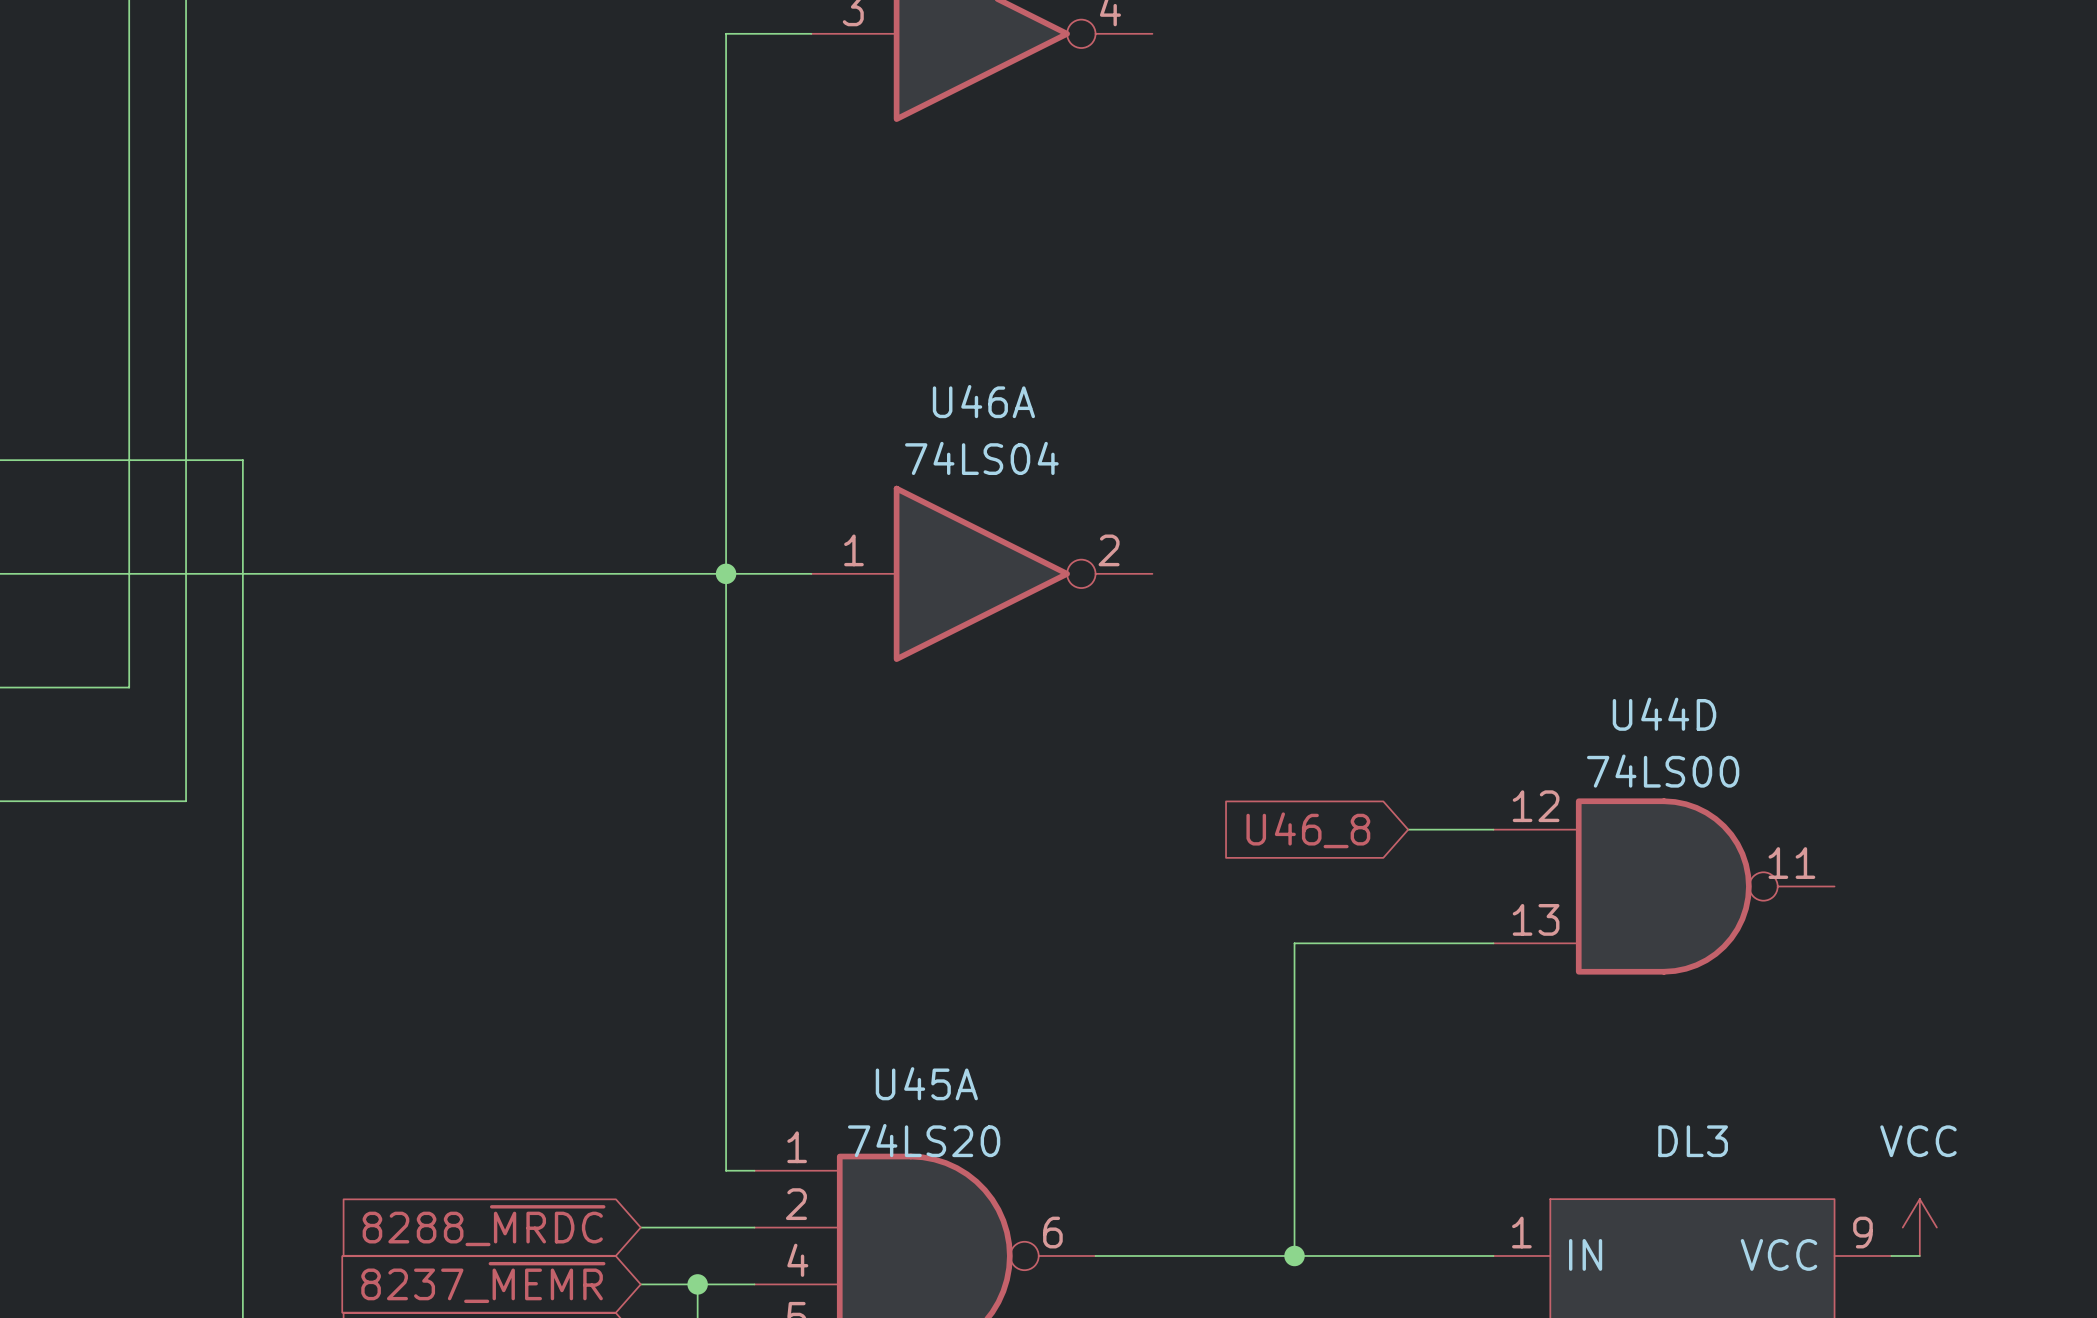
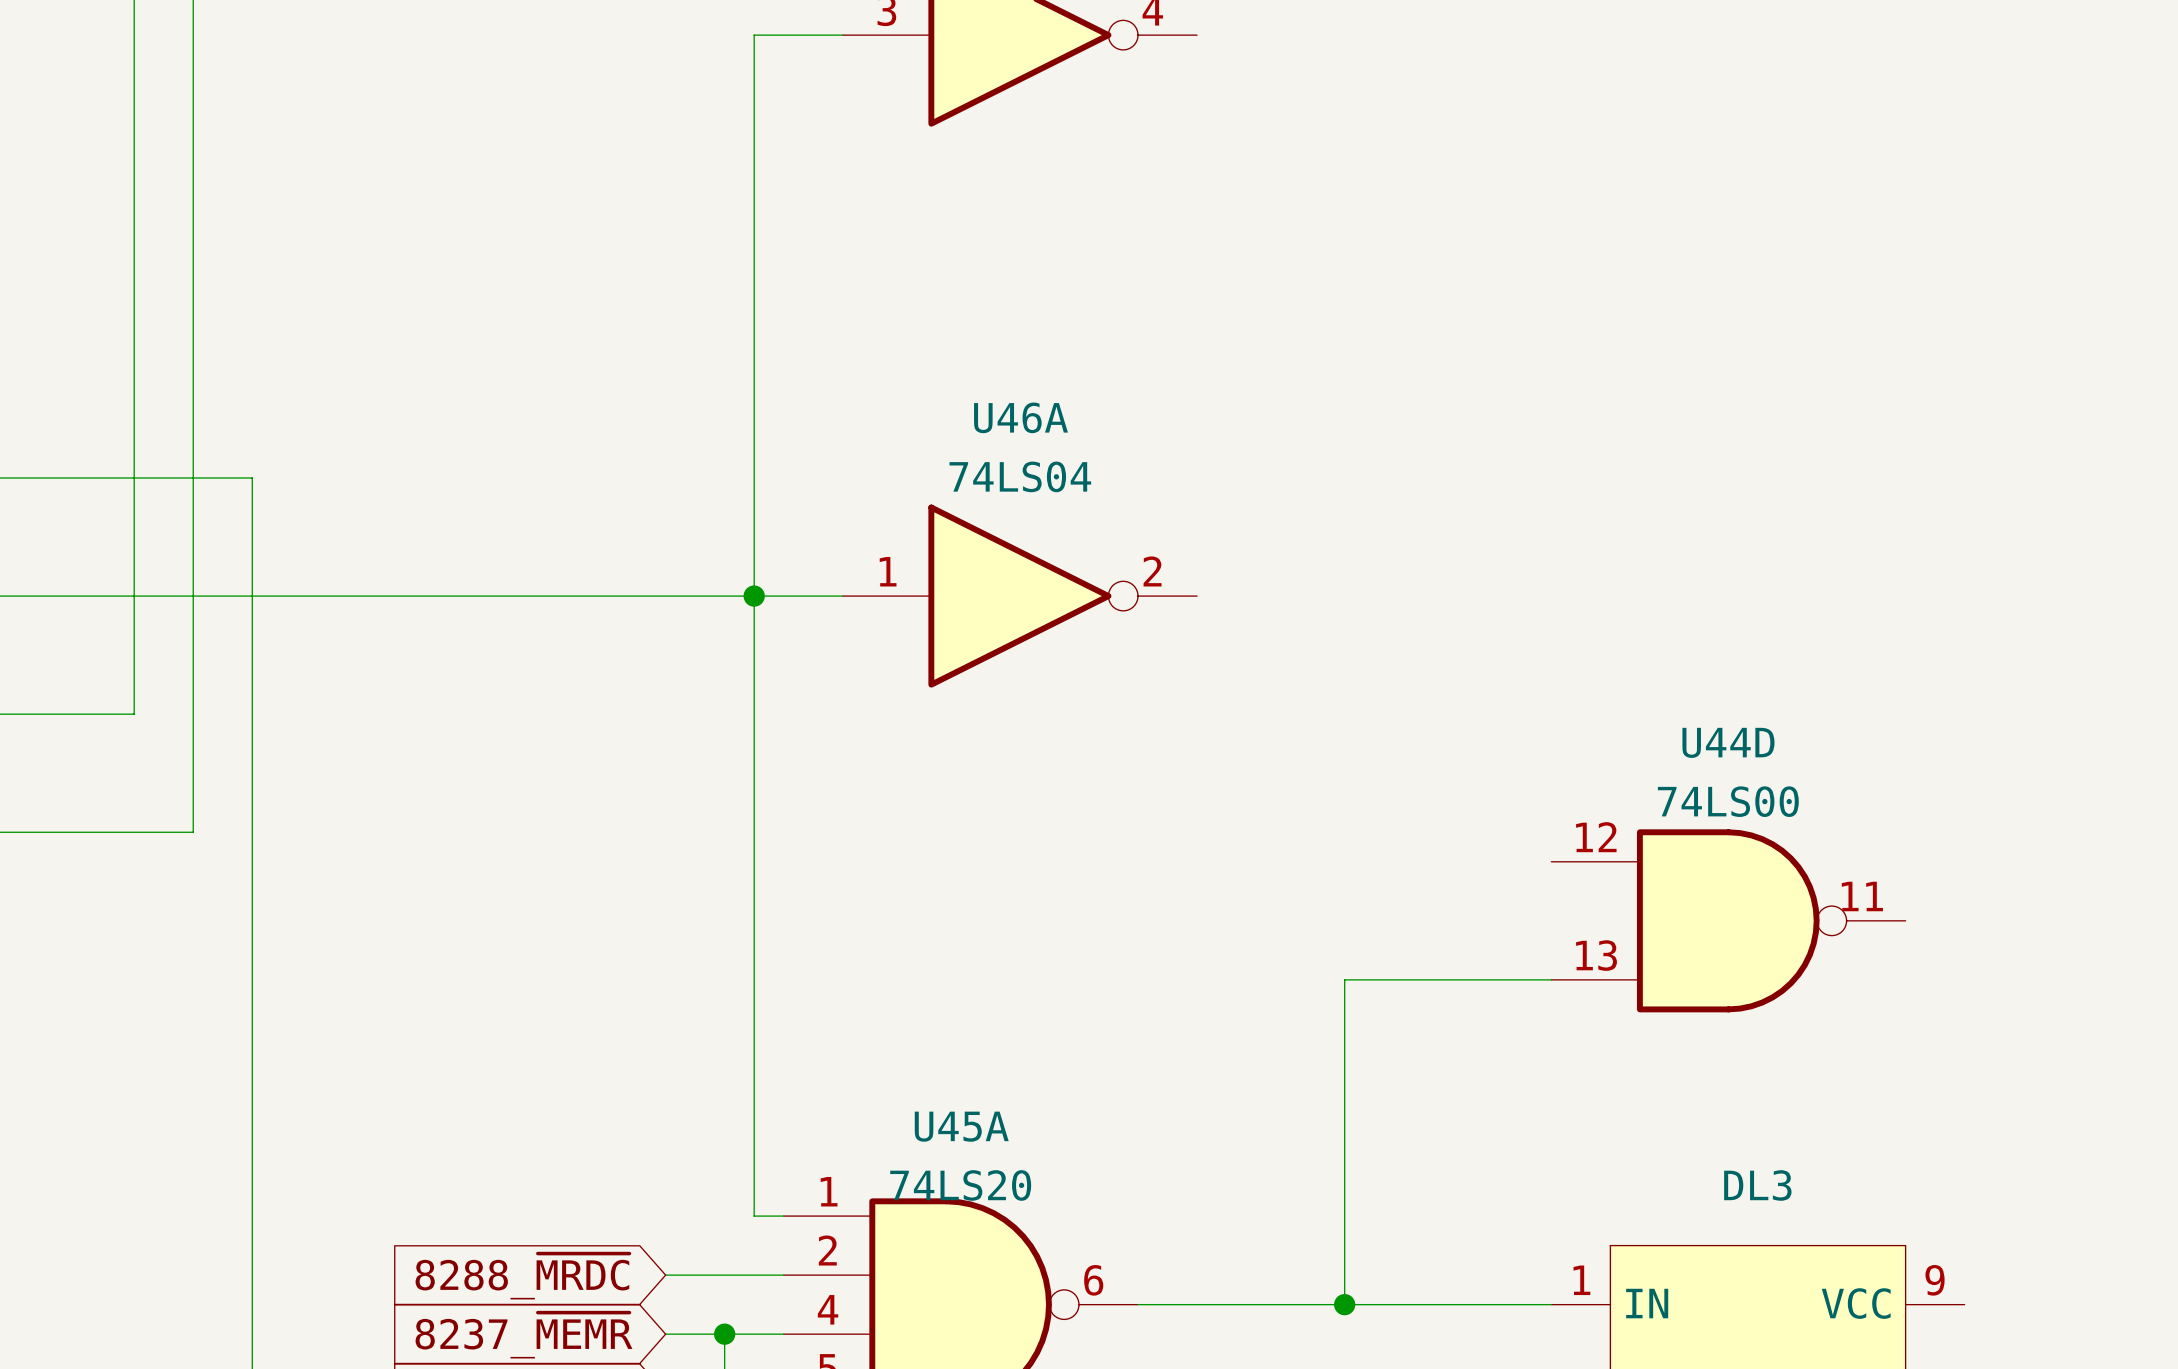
wire: (1408, 829) (1493, 829) -> none
global label: U46_8 (1308, 830) -> none
power symbol: VCC (1919, 1227) -> none
wire: (1891, 1255) (1919, 1255) -> none

